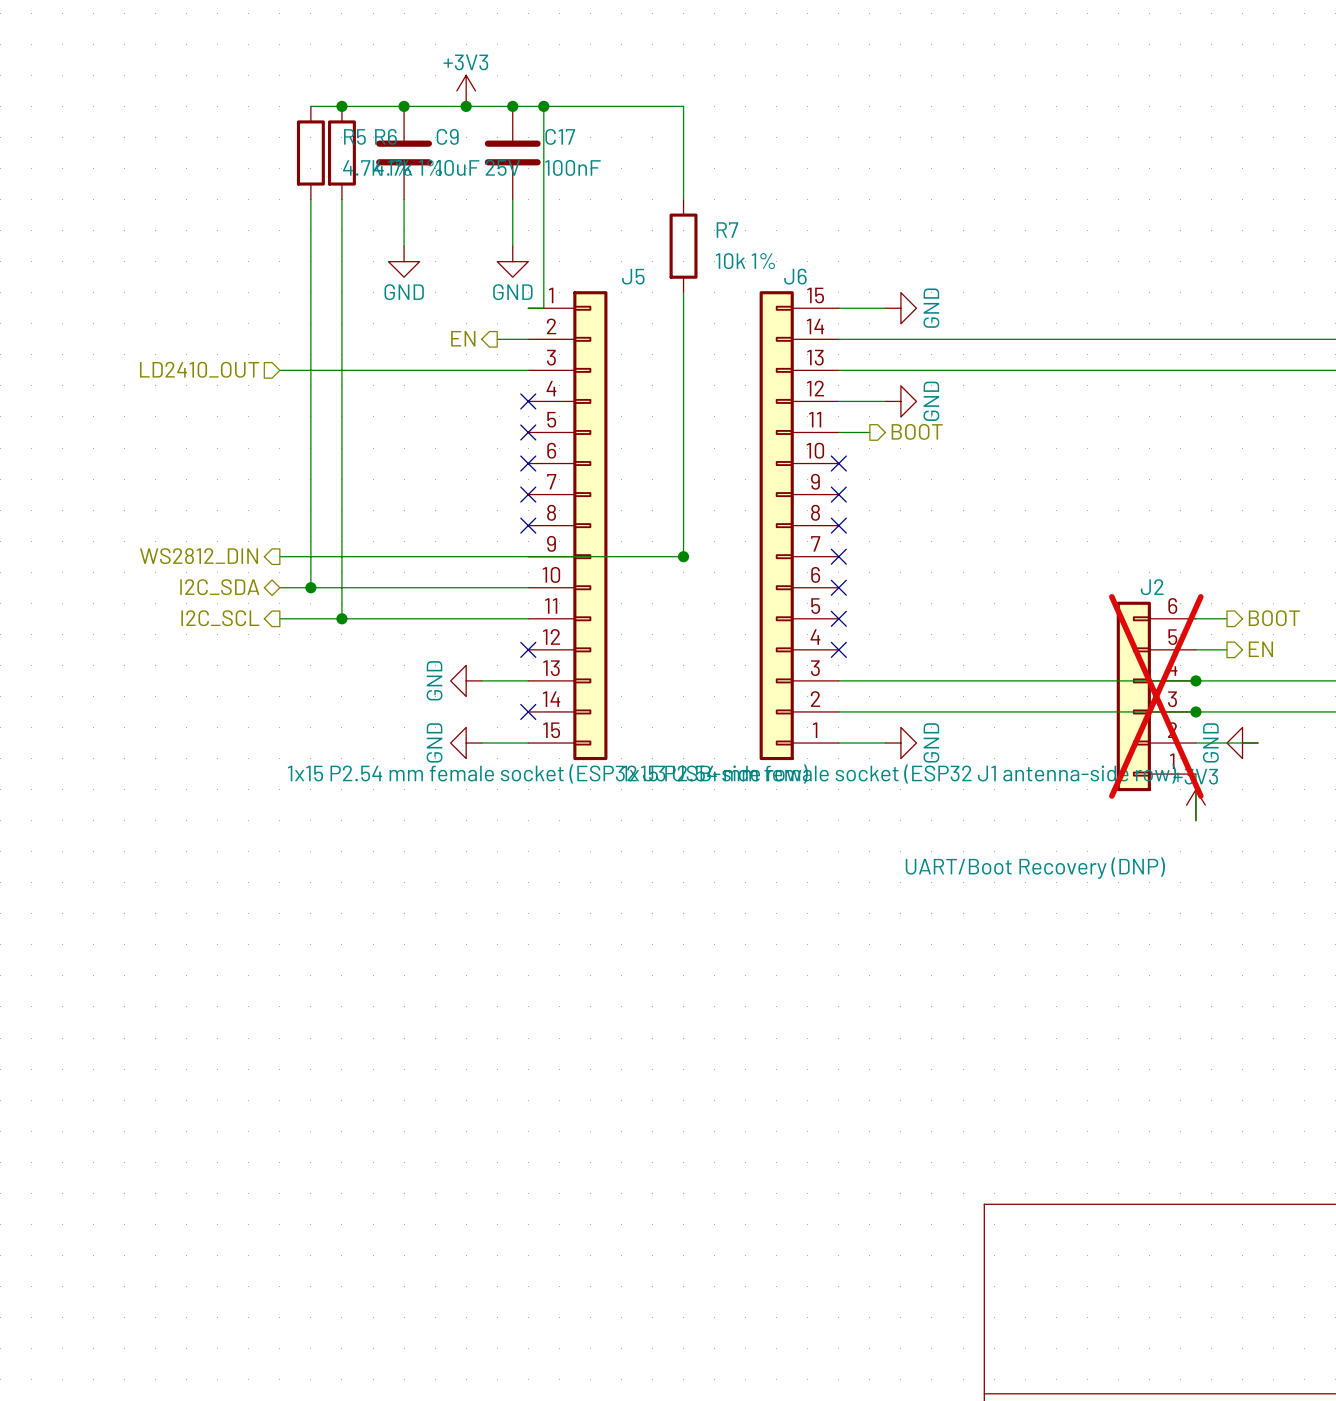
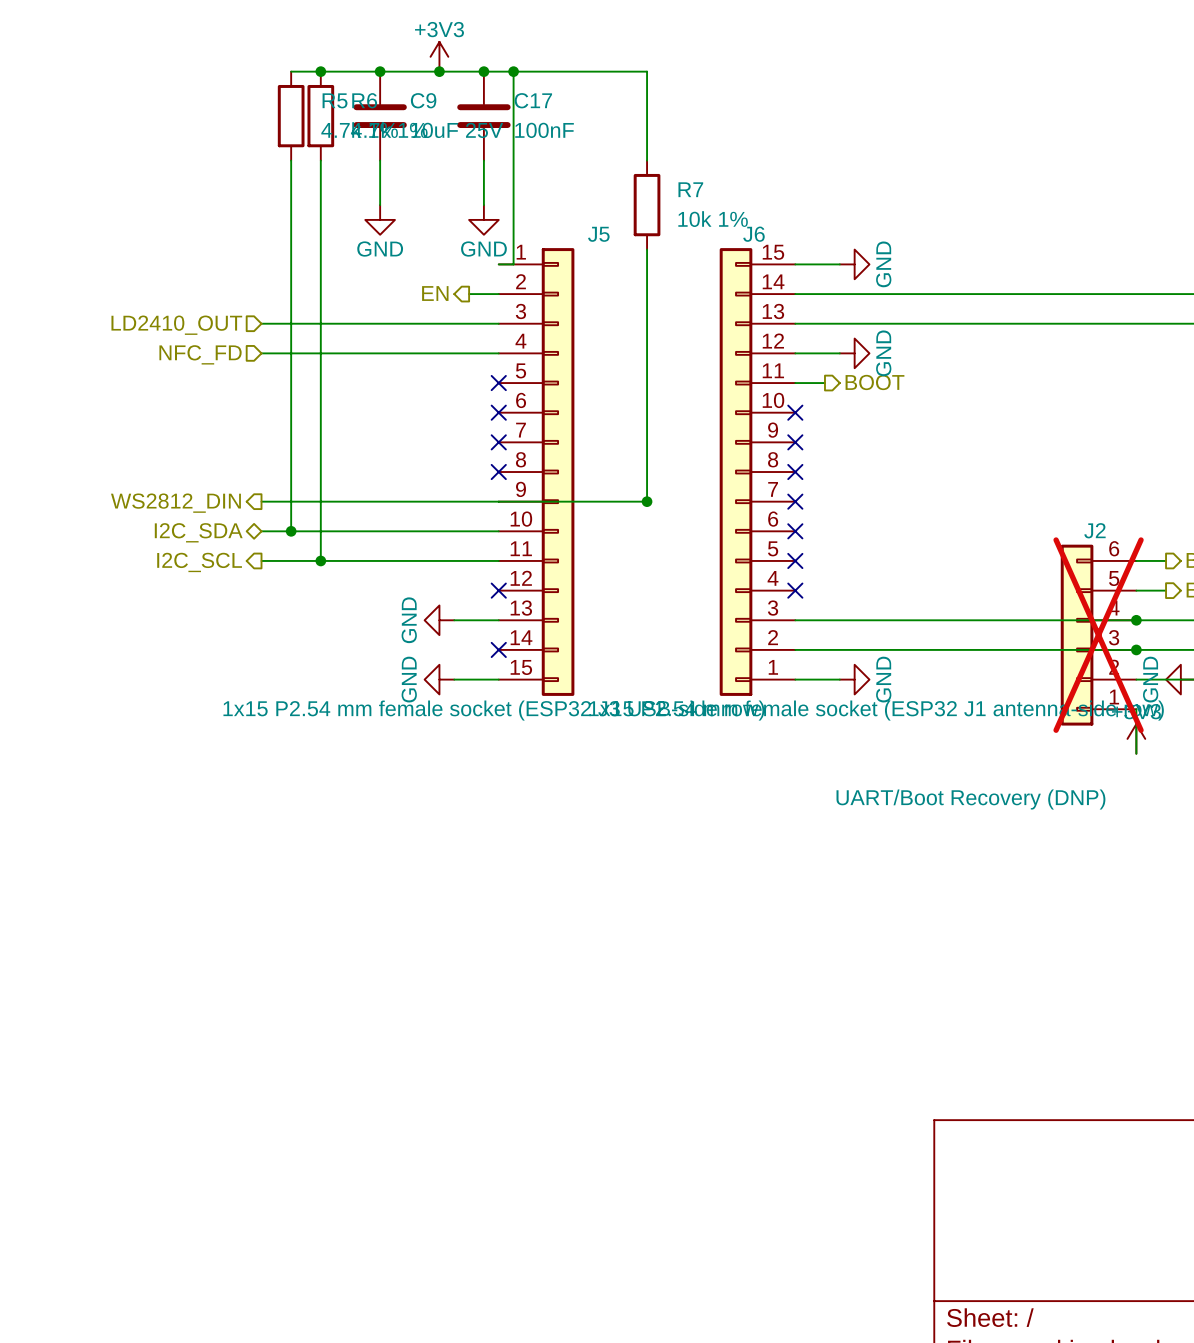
hierarchical label: none -> NFC_FD (200, 354)
wire: none -> (261, 353) (498, 353)
no-connect mark: (528, 401) -> none

